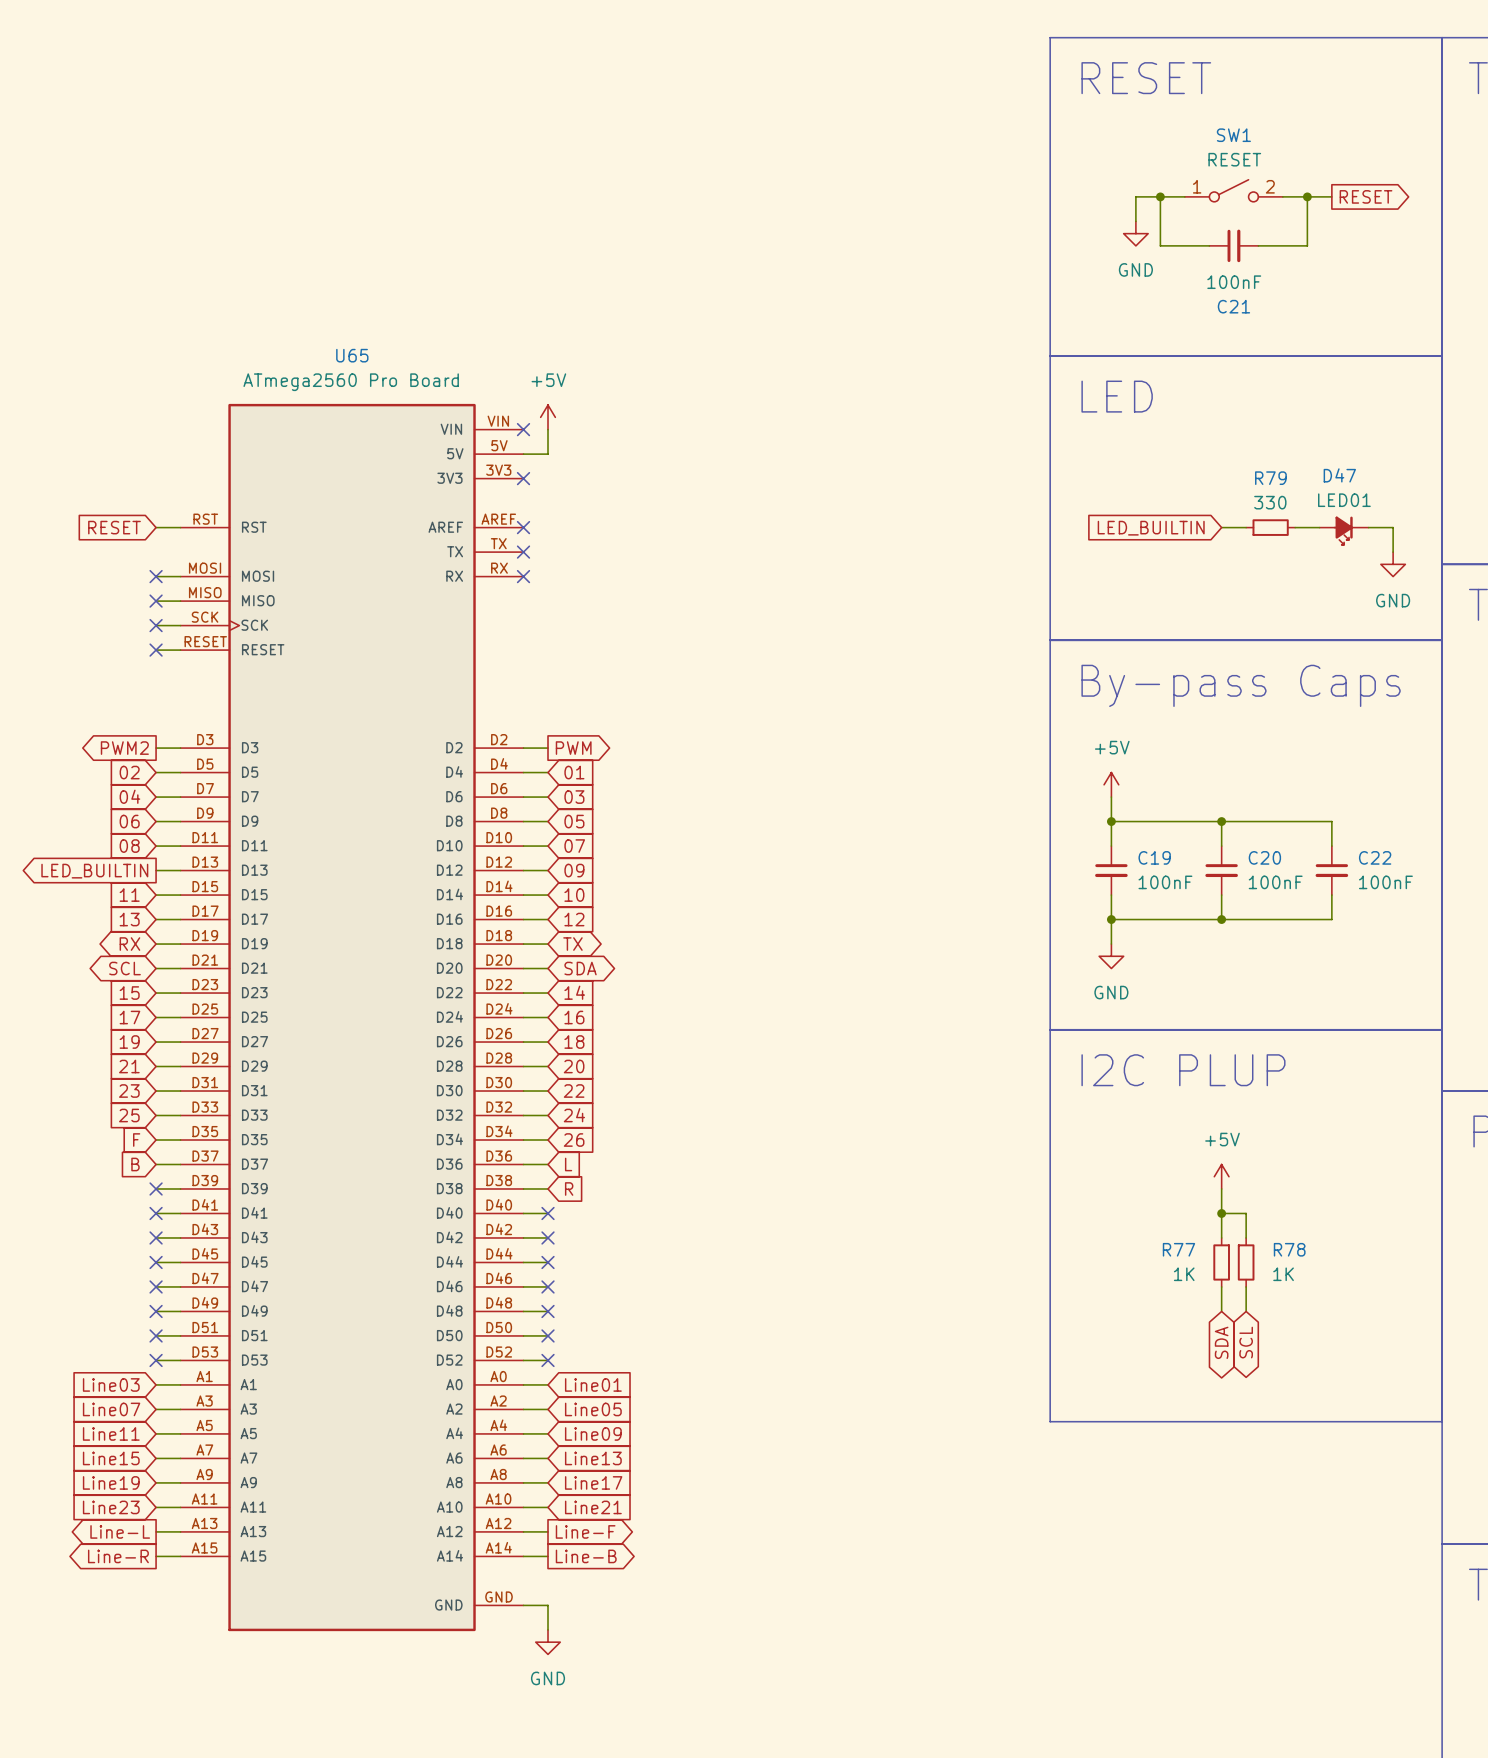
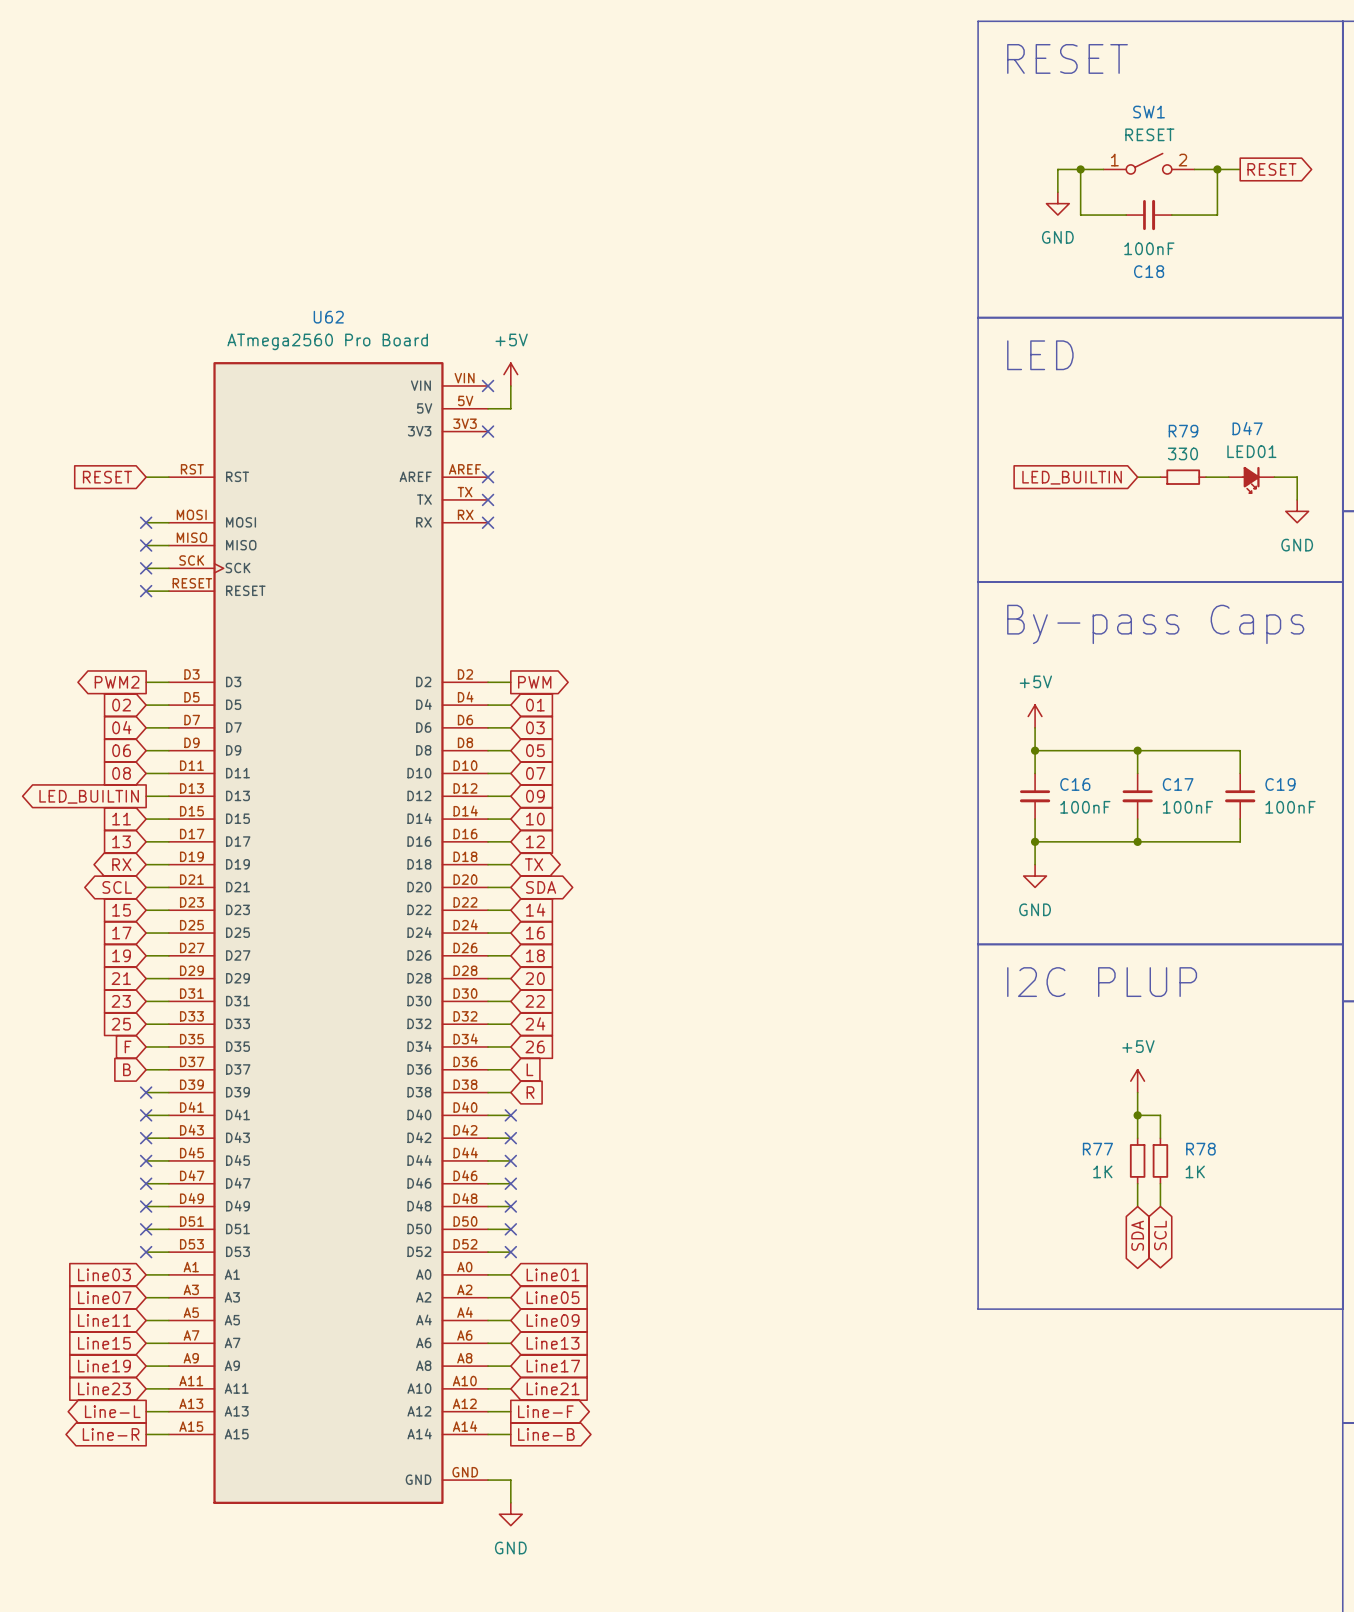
C21 name: C21 (1233, 306) -> C18 (1149, 271)
U65 name: U65 (352, 355) -> U62 (328, 317)
C19 name: C19 (1154, 857) -> C16 (1075, 784)
C20 name: C20 (1264, 857) -> C17 (1178, 784)
C22 name: C22 (1375, 857) -> C19 (1280, 784)

